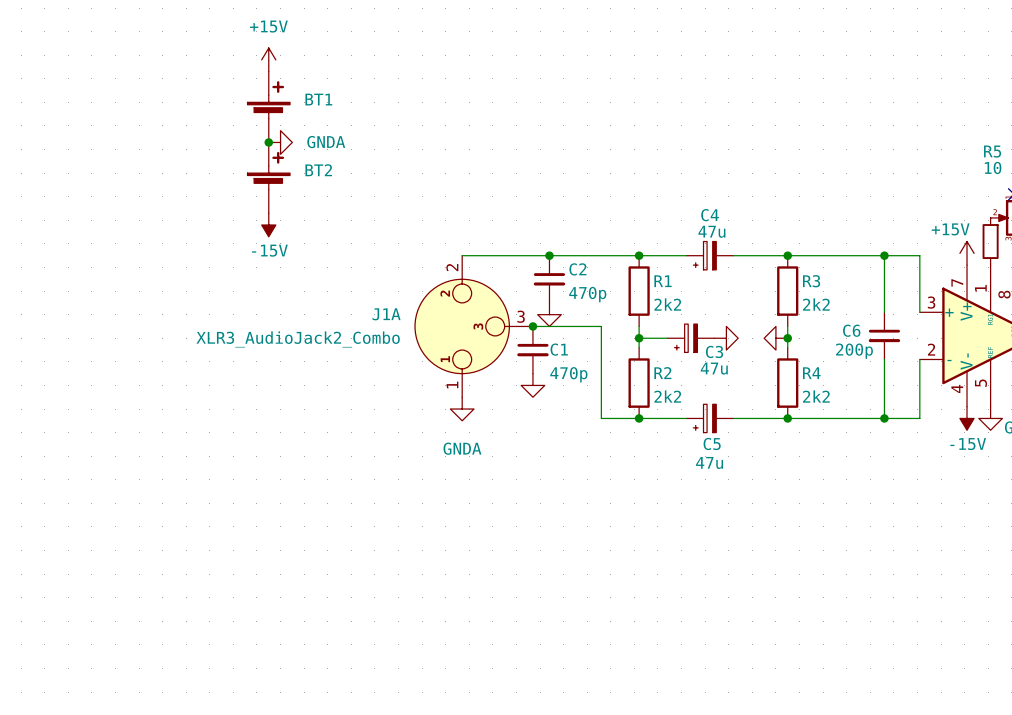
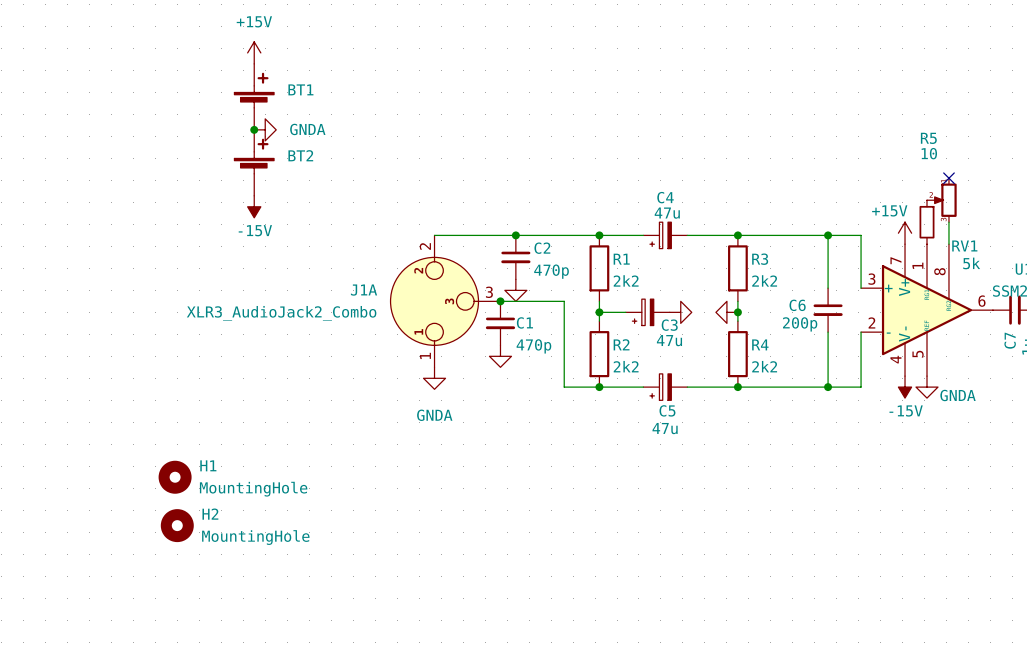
H1: none -> MountingHole (175, 477)
H2: none -> MountingHole (177, 525)

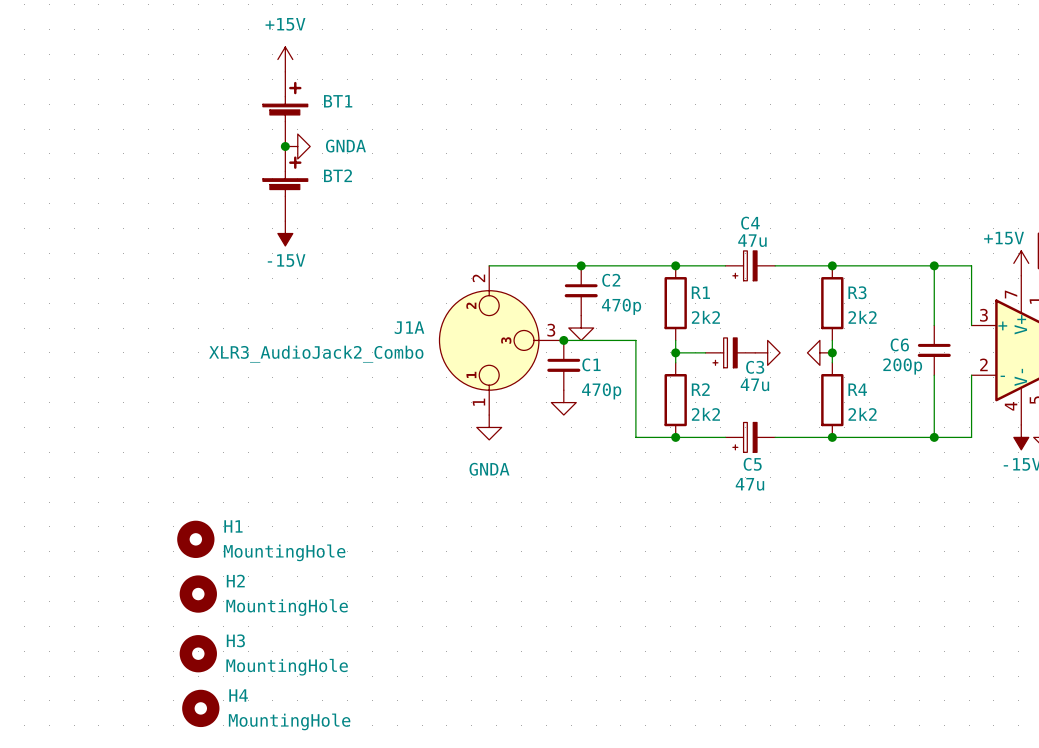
H3: none -> MountingHole (198, 653)
H4: none -> MountingHole (200, 708)

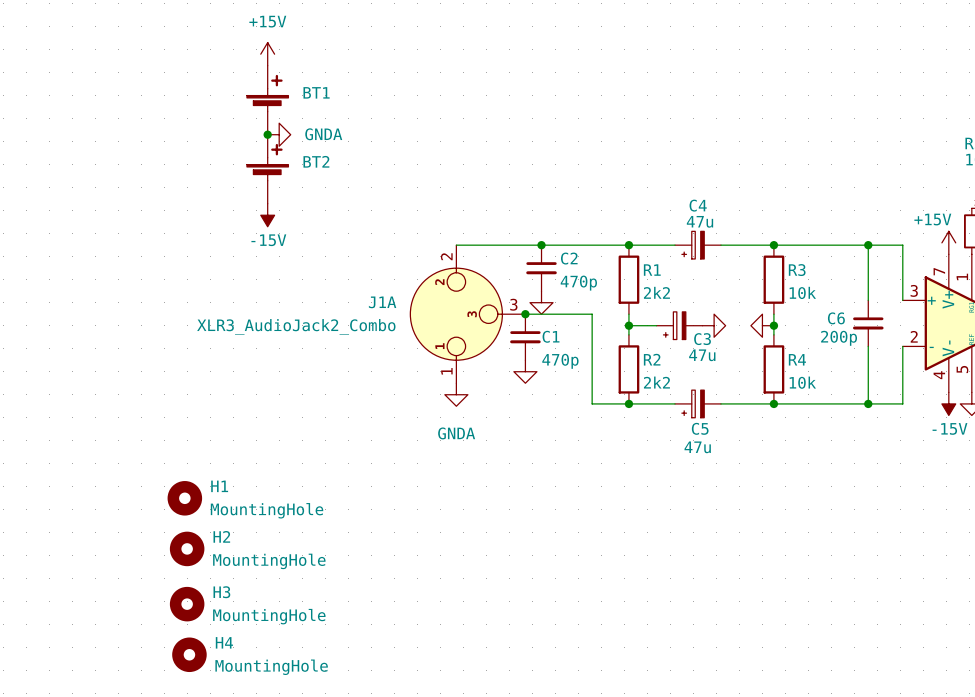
R3 value: 2k2 (862, 317) -> 10k (802, 292)
R4 value: 2k2 (862, 414) -> 10k (802, 382)

